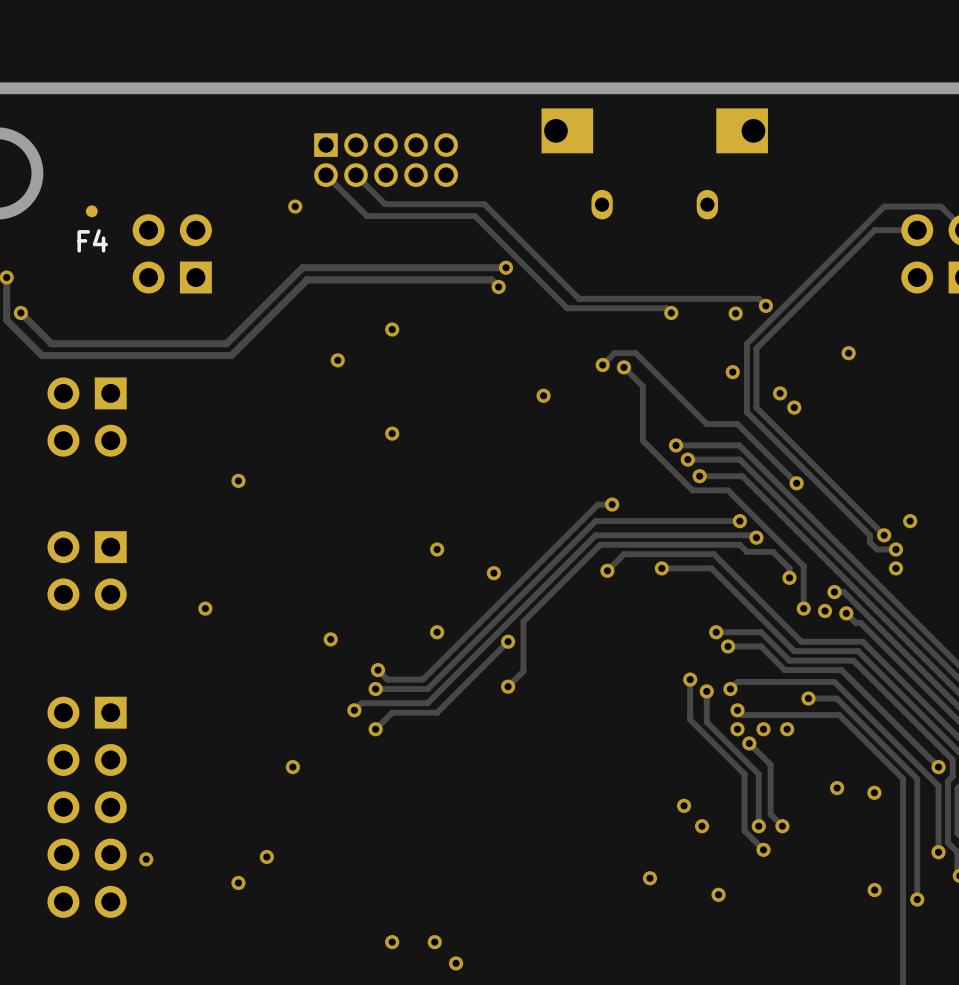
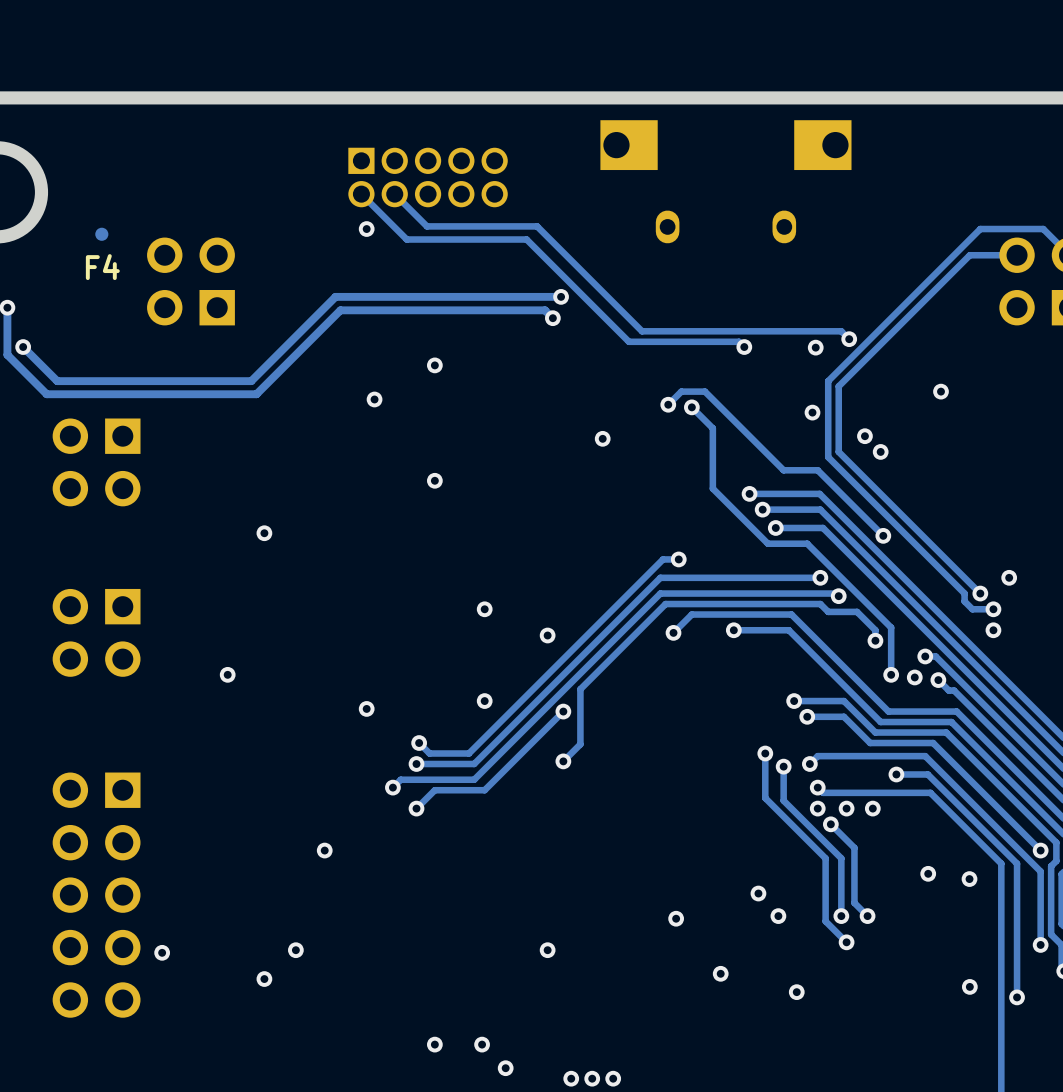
via position: (295, 206) -> (366, 229)
via: none -> (676, 918)
via: none -> (547, 950)
via: none -> (571, 1078)
via: none -> (592, 1078)
via: none -> (613, 1078)

